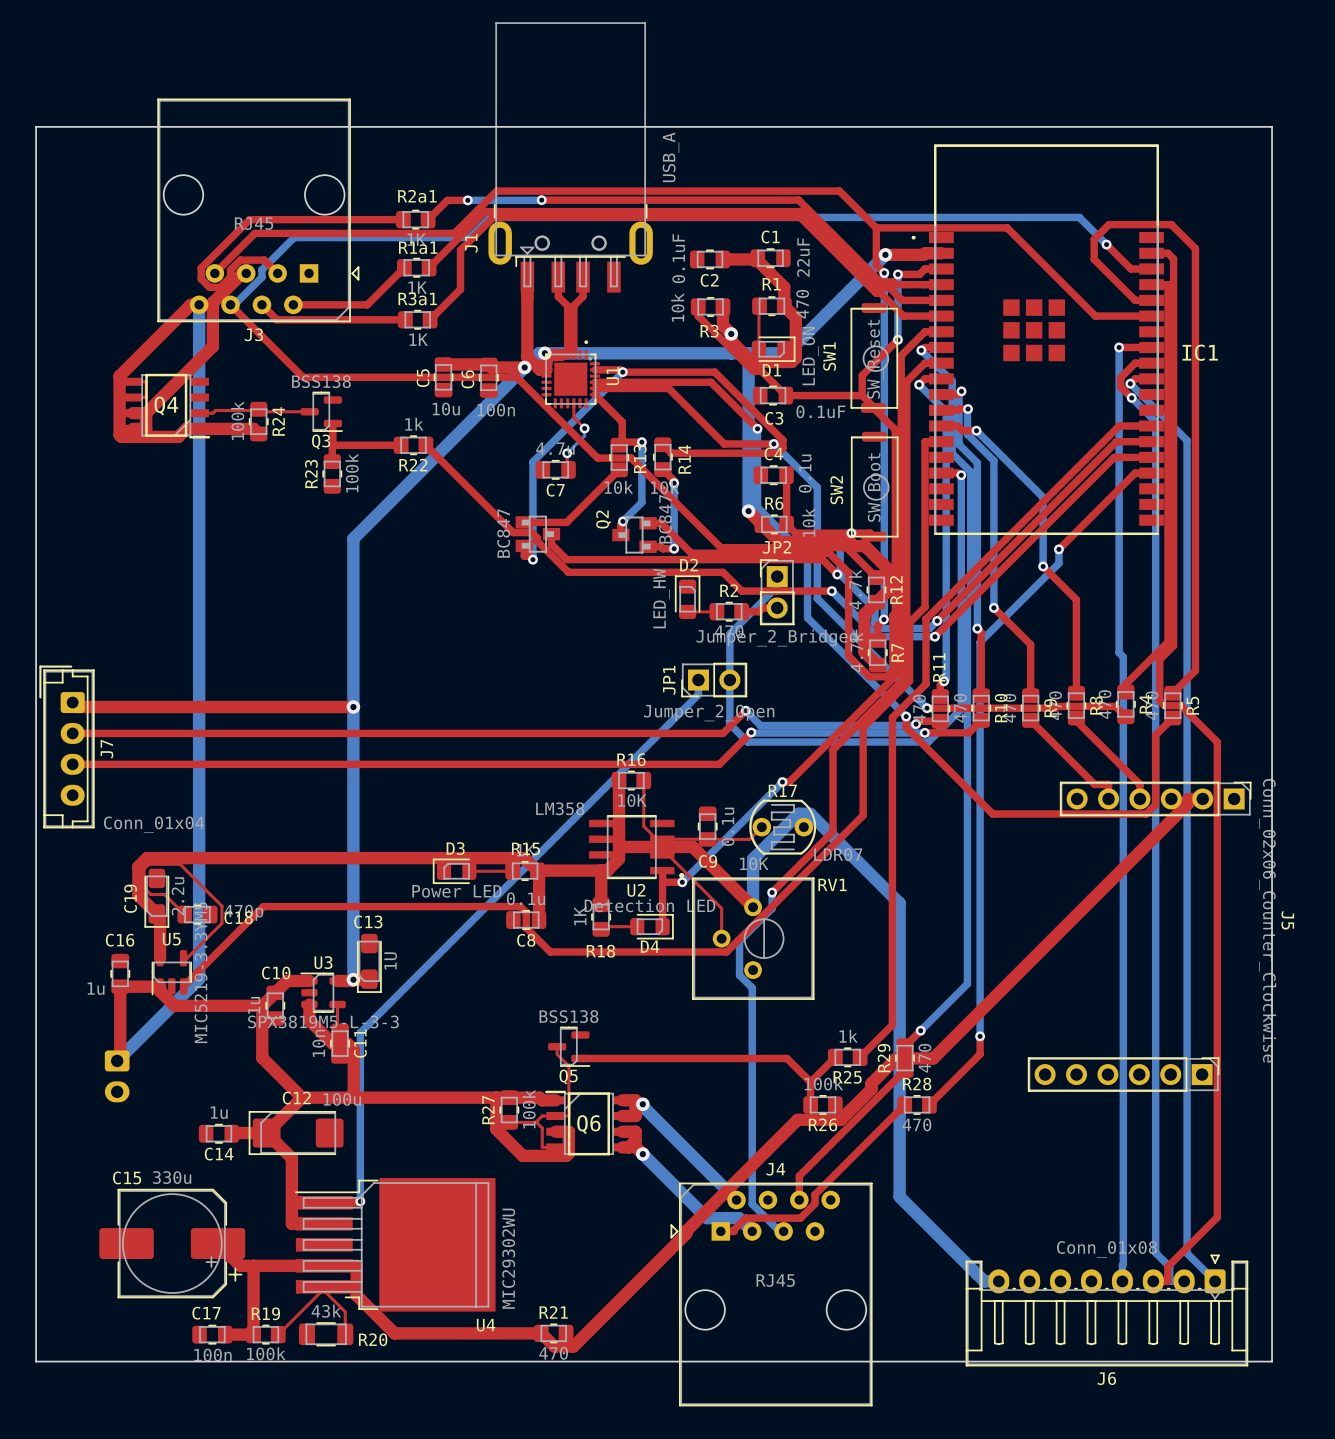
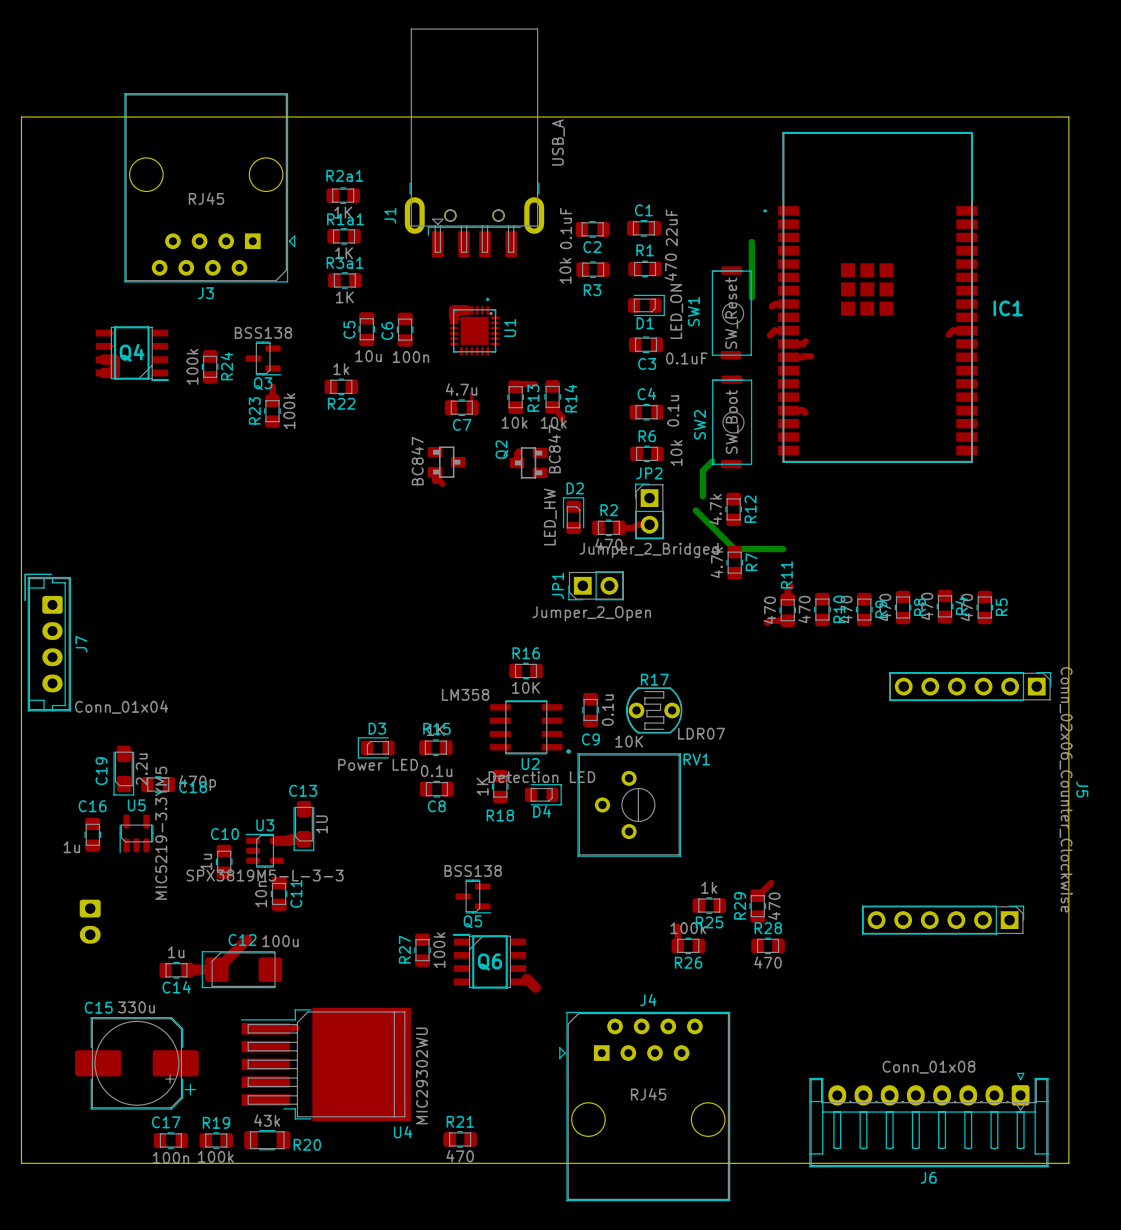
top track: (467, 200) (447, 200) (428, 219) -> none
via: (467, 200) -> none
top track: (541, 200) (798, 200) (880, 281) (892, 281) (895, 284) (941, 284) -> none
bottom track: (541, 200) (467, 200) -> none
via: (541, 200) -> none
top track: (403, 219) (249, 219) (201, 268) (201, 278) (209, 287) (220, 287) (230, 277) (230, 269) (240, 260) (264, 260) (277, 273) -> none
top track: (876, 227) (839, 191) (496, 191) (454, 233) (254, 233) (214, 273) -> none
top track: (876, 227) (876, 265) (884, 273) -> none
top track: (876, 227) (1007, 227) (1095, 316) (1151, 316) -> none
top track: (1106, 244) (1130, 268) (1151, 268) -> none
bottom track: (1106, 244) (1079, 217) (490, 217) (469, 237) (294, 237) (261, 269) (261, 277) (234, 304) (230, 304) -> none
via: (1106, 244) -> none
top track: (941, 253) (885, 254) -> none
top track: (1151, 253) (1167, 253) (1173, 258) (1173, 645) (1159, 659) (1159, 700) (1164, 705) (1180, 705) (1217, 742) (1217, 1217) (1167, 1266) (1167, 1281) (1153, 1281) -> none
bottom track: (885, 254) (786, 353) (538, 353) (353, 538) (353, 979) -> none
via: (885, 254) -> none
top track: (722, 259) (756, 259) -> none
top track: (756, 259) (784, 287) (784, 306) (795, 317) (795, 357) (791, 361) (752, 361) (731, 341) (731, 333) (722, 325) (722, 306) -> none
top track: (404, 267) (367, 304) (293, 304) -> none
top track: (429, 267) (485, 211) (802, 211) (878, 287) (889, 287) (902, 300) (941, 300) -> none
top track: (941, 268) (925, 268) (919, 274) (897, 274) -> none
top track: (246, 273) (242, 273) (212, 302) (212, 346) (146, 413) -> none
bottom track: (884, 273) (883, 619) -> none
via: (884, 273) -> none
via: (897, 274) -> none
top track: (527, 277) (527, 357) (540, 369) (546, 369) -> none
top track: (558, 277) (558, 296) (567, 306) (567, 355) -> none
top track: (583, 277) (583, 296) (573, 305) (573, 355) -> none
top track: (1151, 284) (1167, 284) (1167, 642) (1125, 684) (1125, 692) -> none
top track: (1151, 300) (1135, 300) (1094, 259) (1094, 239) (1109, 224) (1171, 224) (1195, 248) (1195, 670) (1172, 693) -> none
top track: (199, 304) (190, 304) (119, 376) (119, 434) (121, 436) (178, 436) (186, 428) (253, 428) (258, 434) -> none
bottom track: (199, 304) (199, 978) (117, 1060) -> none
top track: (230, 304) (303, 377) (516, 377) (597, 458) (631, 458) (720, 547) (846, 547) (876, 577) -> none
top track: (261, 304) (276, 319) (405, 319) -> none
top track: (698, 306) (698, 316) (753, 371) (761, 371) (785, 395) (862, 395) -> none
top track: (759, 306) (758, 349) -> none
top track: (941, 316) (903, 316) (880, 293) (875, 293) (800, 217) (493, 217) (460, 250) (460, 289) (430, 319) -> none
top track: (941, 331) (925, 331) (901, 355) (901, 615) (898, 617) (898, 672) (789, 782) (782, 782) -> none
via: (731, 333) -> none
top track: (897, 339) (862, 375) (862, 395) -> none
via: (897, 339) -> none
top track: (1119, 347) (1151, 347) -> none
bottom track: (1119, 347) (1119, 652) (1123, 657) (1122, 1281) -> none
via: (1119, 347) -> none
bottom track: (921, 350) (952, 381) (952, 453) (970, 471) (970, 598) (967, 601) (967, 983) (920, 1030) -> none
via: (921, 350) -> none
via: (544, 353) -> none
bottom track: (748, 353) (748, 511) -> none
top track: (941, 363) (925, 363) (906, 381) (906, 617) (904, 620) (904, 678) (833, 749) (833, 831) (772, 892) -> none
top track: (1151, 363) (1135, 363) (1120, 377) (1120, 387) (1131, 397) -> none
top track: (443, 364) (488, 364) (491, 367) (524, 367) -> none
via: (524, 367) -> none
top track: (594, 369) (620, 369) (622, 372) (714, 372) (782, 440) (782, 448) (777, 453) (671, 453) (662, 444) -> none
bottom track: (622, 372) (532, 461) (532, 559) -> none
via: (622, 372) -> none
top track: (594, 382) (711, 382) (757, 428) -> none
bottom track: (1130, 383) (1187, 440) (1187, 1253) (1215, 1281) -> none
via: (1130, 383) -> none
bottom track: (919, 384) (946, 411) (946, 679) (944, 681) -> none
via: (919, 384) -> none
top track: (594, 388) (668, 388) (724, 443) (773, 443) -> none
bottom track: (961, 391) (959, 393) (959, 444) (977, 462) (977, 628) -> none
via: (961, 391) -> none
top track: (594, 394) (622, 421) (622, 442) (619, 445) -> none
top track: (862, 395) (895, 429) (895, 613) (892, 615) (892, 670) (886, 676) (869, 676) (848, 655) (848, 572) (829, 553) (691, 553) (661, 523) (648, 523) -> none
bottom track: (1131, 397) (1155, 421) (1155, 1252) (1169, 1266) (1169, 1281) (1184, 1281) -> none
via: (1131, 397) -> none
top track: (573, 403) (573, 417) (584, 428) -> none
bottom track: (968, 409) (967, 434) (993, 460) (993, 607) -> none
via: (968, 409) -> none
top track: (258, 410) (215, 410) (212, 413) (199, 413) -> none
top track: (258, 410) (309, 411) -> none
top track: (332, 423) (332, 445) (401, 445) -> none
top track: (941, 425) (957, 425) (962, 430) (976, 430) -> none
top track: (1151, 425) (1119, 425) (925, 619) (925, 684) (892, 717) (892, 1025) (860, 1057) -> none
bottom track: (584, 428) (584, 435) (567, 453) -> none
via: (584, 428) -> none
bottom track: (757, 428) (757, 507) (807, 557) (807, 617) (906, 716) -> none
via: (757, 428) -> none
bottom track: (976, 430) (1043, 497) (1043, 566) -> none
via: (976, 430) -> none
top track: (941, 441) (925, 441) (925, 607) (909, 622) (909, 681) (863, 727) (863, 815) (726, 951) (550, 951) (526, 927) (526, 912) (520, 906) (263, 906) (183, 986) -> none
top track: (1151, 441) (1116, 441) (937, 620) -> none
bottom track: (641, 442) (641, 502) (622, 521) -> none
via: (641, 442) -> none
bottom track: (773, 443) (817, 487) (817, 598) (926, 708) -> none
via: (773, 443) -> none
top track: (425, 445) (513, 532) (531, 532) (536, 537) (536, 540) (568, 572) (722, 572) (741, 591) (831, 591) -> none
via: (567, 453) -> none
top track: (1151, 457) (1114, 457) (934, 636) -> none
top track: (619, 469) (566, 522) (524, 522) -> none
top track: (1151, 473) (1135, 473) (1058, 549) -> none
top track: (786, 475) (786, 524) (795, 533) (870, 533) (873, 536) -> none
bottom track: (961, 475) (961, 709) (928, 742) (747, 742) (729, 724) (729, 633) (772, 591) (777, 591) (777, 576) -> none
via: (961, 475) -> none
bottom track: (674, 483) (674, 548) -> none
via: (674, 483) -> none
top track: (748, 511) (779, 542) (850, 542) (854, 546) (865, 546) (889, 570) (889, 589) (864, 614) (864, 651) (877, 665) -> none
via: (748, 511) -> none
via: (622, 521) -> none
via: (851, 533) -> none
top track: (551, 534) (551, 544) (566, 559) (822, 559) (837, 574) -> none
top track: (648, 546) (674, 548) -> none
via: (674, 548) -> none
bottom track: (1058, 549) (1058, 563) (980, 642) (980, 1036) -> none
via: (1058, 549) -> none
via: (532, 559) -> none
top track: (1043, 566) (1076, 599) (1076, 693) -> none
via: (1043, 566) -> none
bottom track: (837, 574) (840, 574) (874, 609) (874, 623) (880, 628) (929, 628) (937, 620) -> none
via: (837, 574) -> none
via: (831, 591) -> none
top track: (993, 607) (1030, 644) (1030, 695) -> none
via: (993, 607) -> none
top track: (716, 611) (687, 611) -> none
top track: (883, 619) (877, 625) (877, 640) -> none
via: (883, 619) -> none
via: (937, 620) -> none
top track: (977, 628) (981, 632) (981, 695) -> none
via: (977, 628) -> none
via: (934, 636) -> none
bottom track: (698, 680) (698, 694) (360, 1032) (360, 1201) -> none
via: (944, 681) -> none
top track: (72, 702) (77, 707) (353, 707) -> none
via: (353, 707) -> none
top track: (926, 708) (1115, 706) (1125, 716) -> none
via: (926, 708) -> none
top track: (745, 710) (723, 733) (72, 733) -> none
bottom track: (745, 710) (760, 725) (916, 724) -> none
via: (745, 710) -> none
top track: (906, 716) (906, 727) (992, 814) (1146, 814) (1155, 804) (1155, 735) (1172, 718) -> none
via: (906, 716) -> none
top track: (1076, 718) (1076, 720) (1139, 784) (1139, 798) -> none
top track: (981, 720) (968, 732) (924, 732) -> none
top track: (1030, 720) (1094, 784) (1108, 784) (1108, 798) -> none
via: (916, 724) -> none
top track: (751, 732) (719, 764) (72, 764) -> none
bottom track: (751, 732) (924, 732) -> none
via: (751, 732) -> none
via: (924, 732) -> none
top track: (619, 780) (619, 858) (607, 870) (537, 871) -> none
top track: (643, 780) (643, 826) (656, 839) (749, 839) (761, 827) -> none
bottom track: (782, 782) (682, 882) -> none
via: (782, 782) -> none
top track: (1202, 798) (1188, 798) (1188, 803) (933, 1058) (896, 1058) (871, 1083) (871, 1089) (840, 1119) (797, 1119) (573, 1346) (554, 1346) (541, 1333) (394, 1333) (356, 1295) (356, 1265) (240, 1265) (218, 1243) -> none
top track: (619, 846) (692, 846) (753, 907) -> none
top track: (662, 854) (668, 854) (721, 908) (721, 938) -> none
top track: (601, 870) (601, 904) -> none
top track: (662, 870) (662, 926) -> none
top track: (512, 871) (469, 871) -> none
top track: (662, 882) (682, 882) -> none
via: (682, 882) -> none
bottom track: (772, 892) (772, 908) (739, 941) (739, 975) (752, 987) (752, 1204) (779, 1231) (783, 1231) -> none
via: (772, 892) -> none
bottom track: (753, 907) (753, 859) (798, 813) (810, 813) (899, 903) (899, 1196) (984, 1281) (998, 1281) -> none
top track: (184, 914) (164, 894) (150, 894) (144, 887) (144, 869) (148, 864) (180, 864) (221, 906) (221, 923) (187, 958) (183, 958) -> none
top track: (539, 920) (539, 872) (524, 858) (147, 858) (138, 866) (138, 895) (160, 917) (160, 958) -> none
top track: (637, 926) (603, 926) (601, 929) -> none
via: (353, 979) -> none
top track: (309, 980) (287, 980) (262, 1005) -> none
top track: (309, 1004) (309, 1020) (332, 1043) (347, 1043) (353, 1049) (353, 1097) -> none
top track: (337, 1004) (337, 1028) (340, 1030) -> none
top track: (262, 1005) (174, 1005) (160, 991) (160, 986) (120, 986) (120, 1057) (117, 1060) -> none
top track: (262, 1005) (262, 1057) (302, 1097) (539, 1097) (542, 1100) (555, 1100) -> none
via: (920, 1030) -> none
top track: (980, 1036) (980, 1054) (929, 1104) -> none
via: (980, 1036) -> none
top track: (557, 1046) (557, 1054) (568, 1066) (568, 1116) (542, 1116) (536, 1122) -> none
top track: (835, 1057) (810, 1082) (787, 1058) (580, 1058) -> none
top track: (904, 1070) (799, 1176) (799, 1200) -> none
top track: (496, 1097) (496, 1129) (522, 1155) (566, 1155) (568, 1153) (568, 1131) (555, 1131) -> none
top track: (622, 1100) (635, 1100) (635, 1116) (622, 1116) -> none
bottom track: (642, 1104) (736, 1200) -> none
via: (642, 1104) -> none
top track: (904, 1104) (815, 1194) (815, 1203) (800, 1218) (745, 1218) (734, 1231) (720, 1231) -> none
top track: (509, 1122) (536, 1122) -> none
top track: (536, 1122) (542, 1128) (542, 1147) (555, 1147) -> none
top track: (622, 1131) (635, 1131) (635, 1140) (628, 1147) (622, 1147) -> none
top track: (266, 1133) (291, 1158) (291, 1223) (324, 1223) -> none
bottom track: (642, 1154) (706, 1218) (738, 1218) (752, 1231) -> none
via: (642, 1154) -> none
via: (360, 1201) -> none
top track: (253, 1265) (253, 1334) (225, 1334) -> none
top track: (320, 1286) (320, 1292) (278, 1334) -> none
top track: (320, 1286) (345, 1311) (345, 1334) -> none

